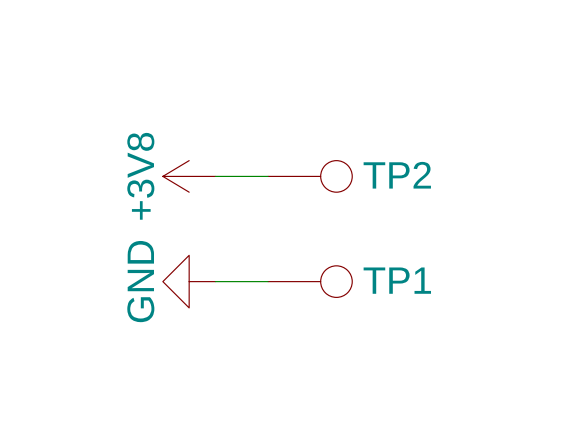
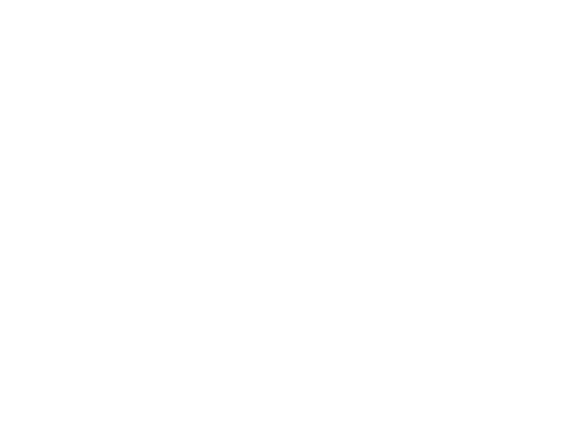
power symbol: +3V8 (189, 176) -> none
wire: (215, 176) (268, 176) -> none
TP2: (310, 176) -> none
power symbol: GND (189, 281) -> none
wire: (215, 281) (268, 281) -> none
TP1: (310, 281) -> none

